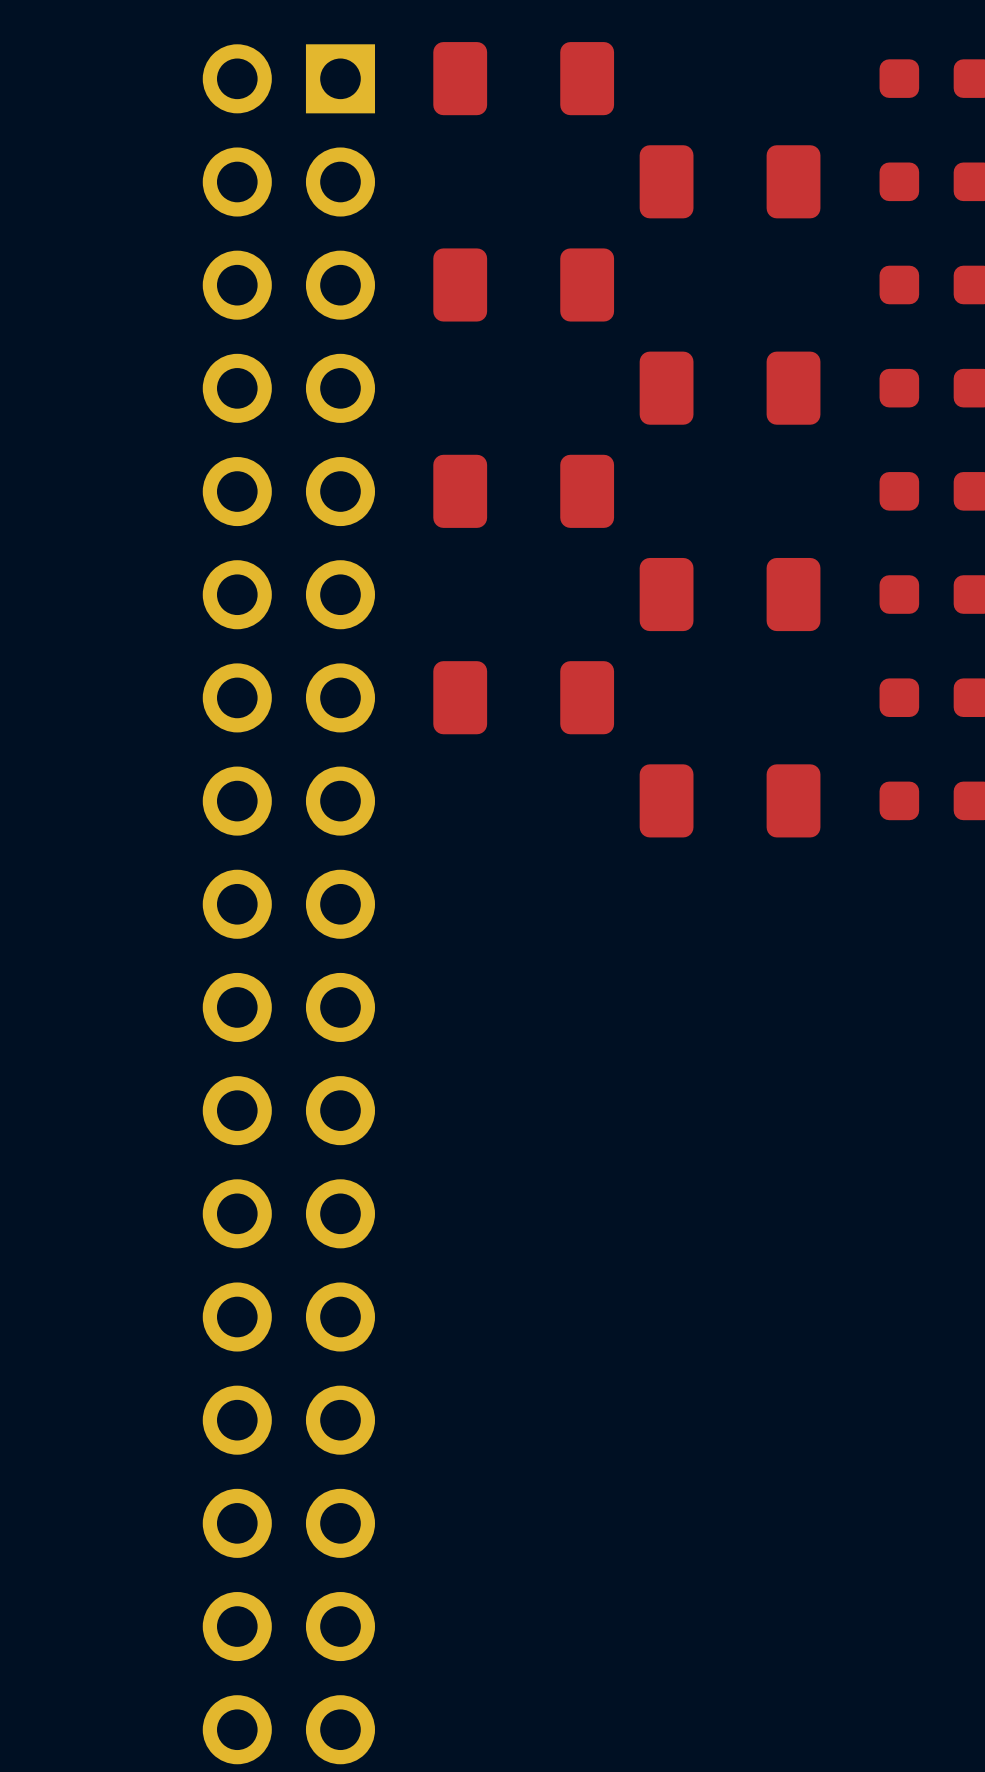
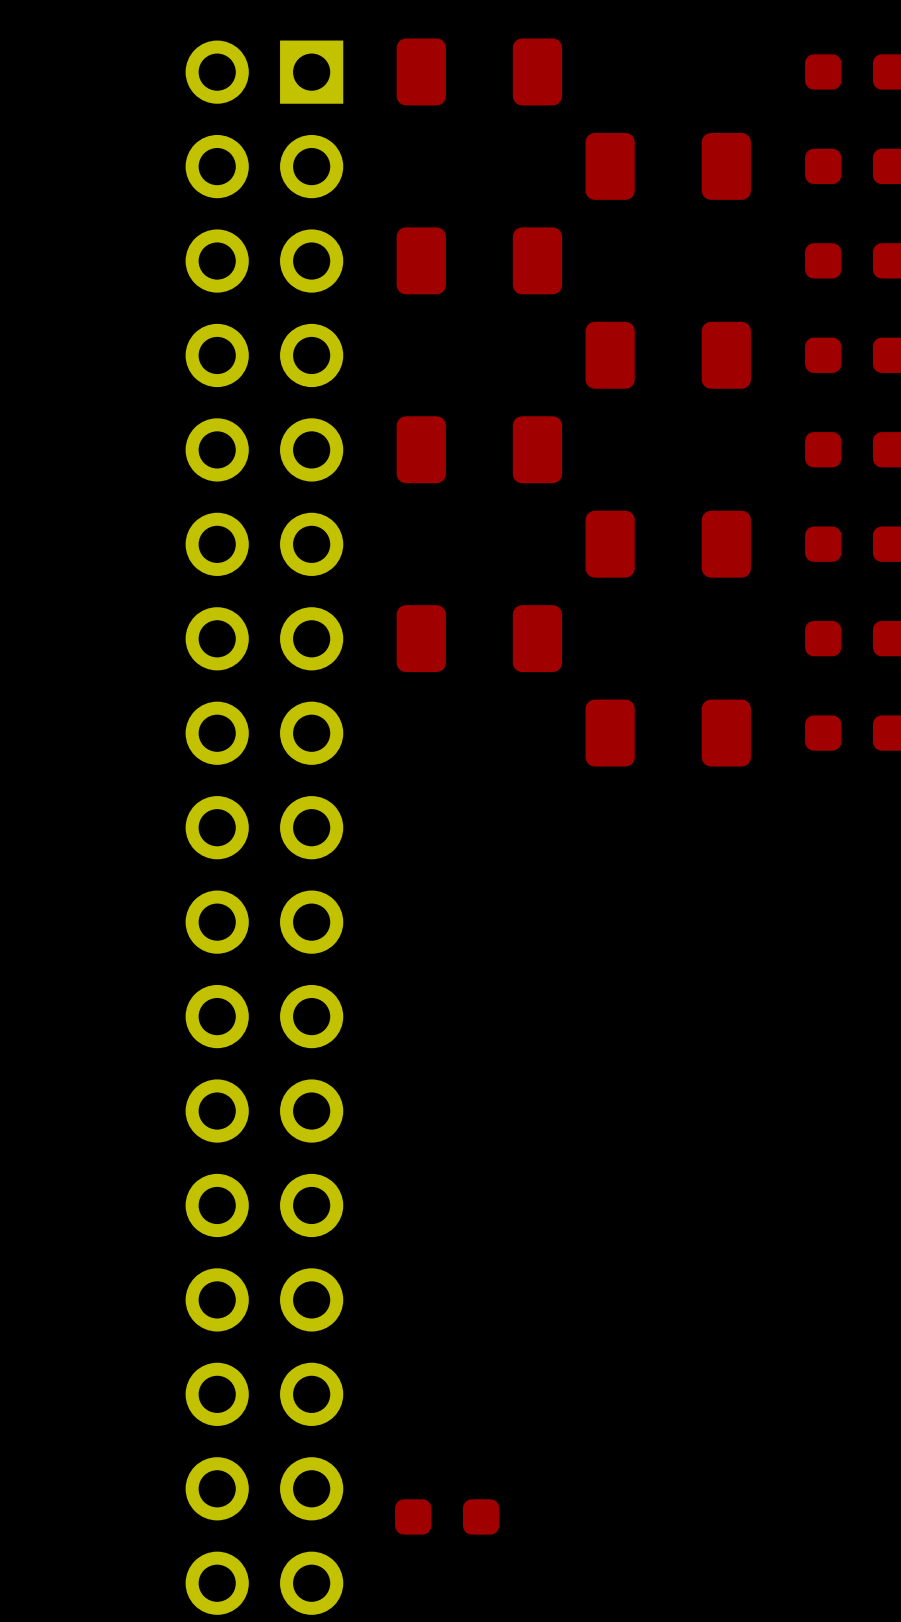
part: none -> (447, 1516)

